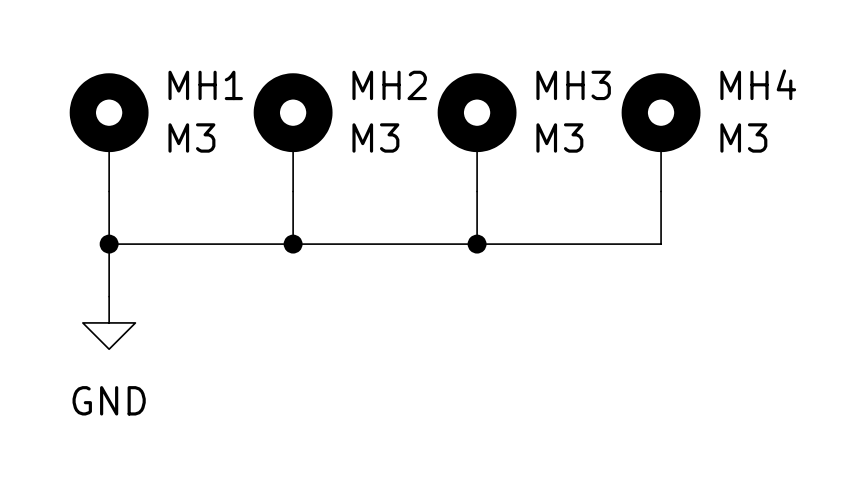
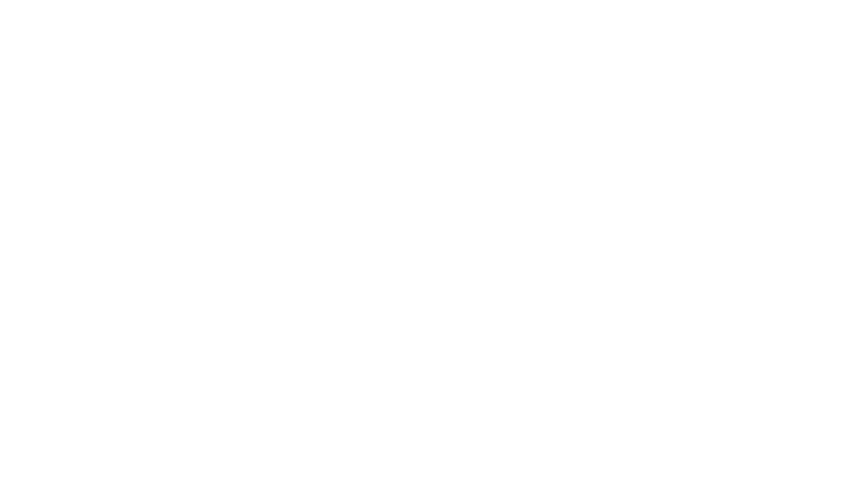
MH1: M3 (109, 132) -> none
MH2: M3 (293, 132) -> none
MH3: M3 (477, 132) -> none
MH4: M3 (661, 132) -> none
wire: (109, 191) (109, 296) -> none
wire: (293, 191) (293, 244) -> none
wire: (477, 191) (477, 244) -> none
wire: (661, 191) (661, 244) (109, 244) -> none
junction: (109, 244) -> none
junction: (293, 244) -> none
junction: (477, 244) -> none
power symbol: GND (109, 322) -> none

